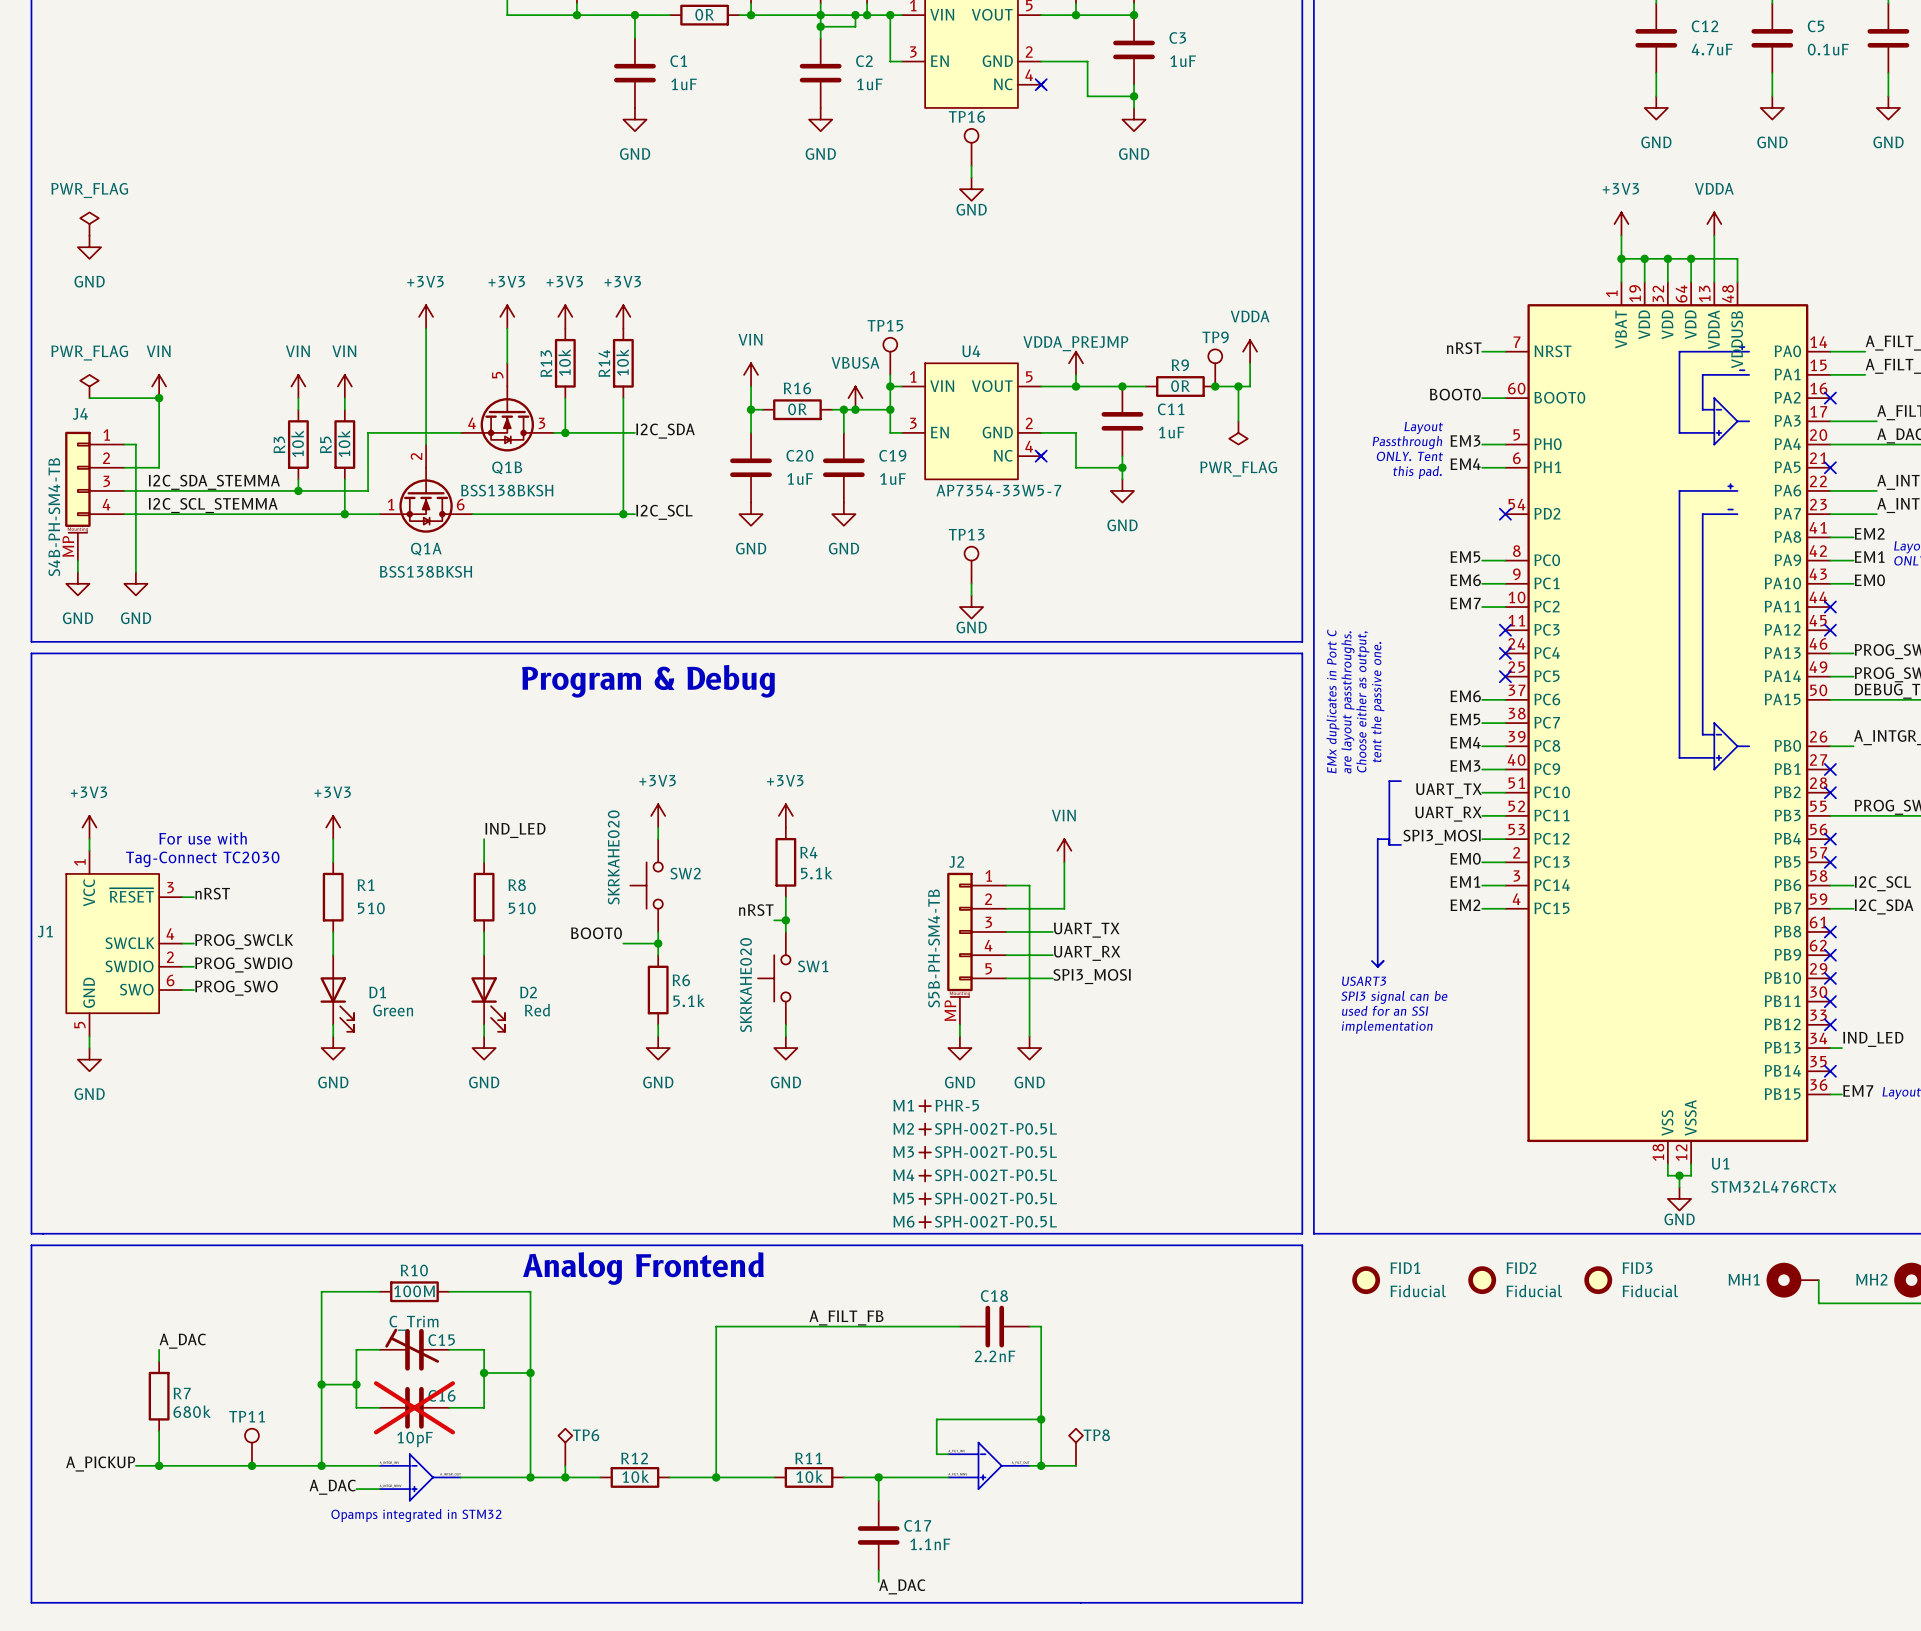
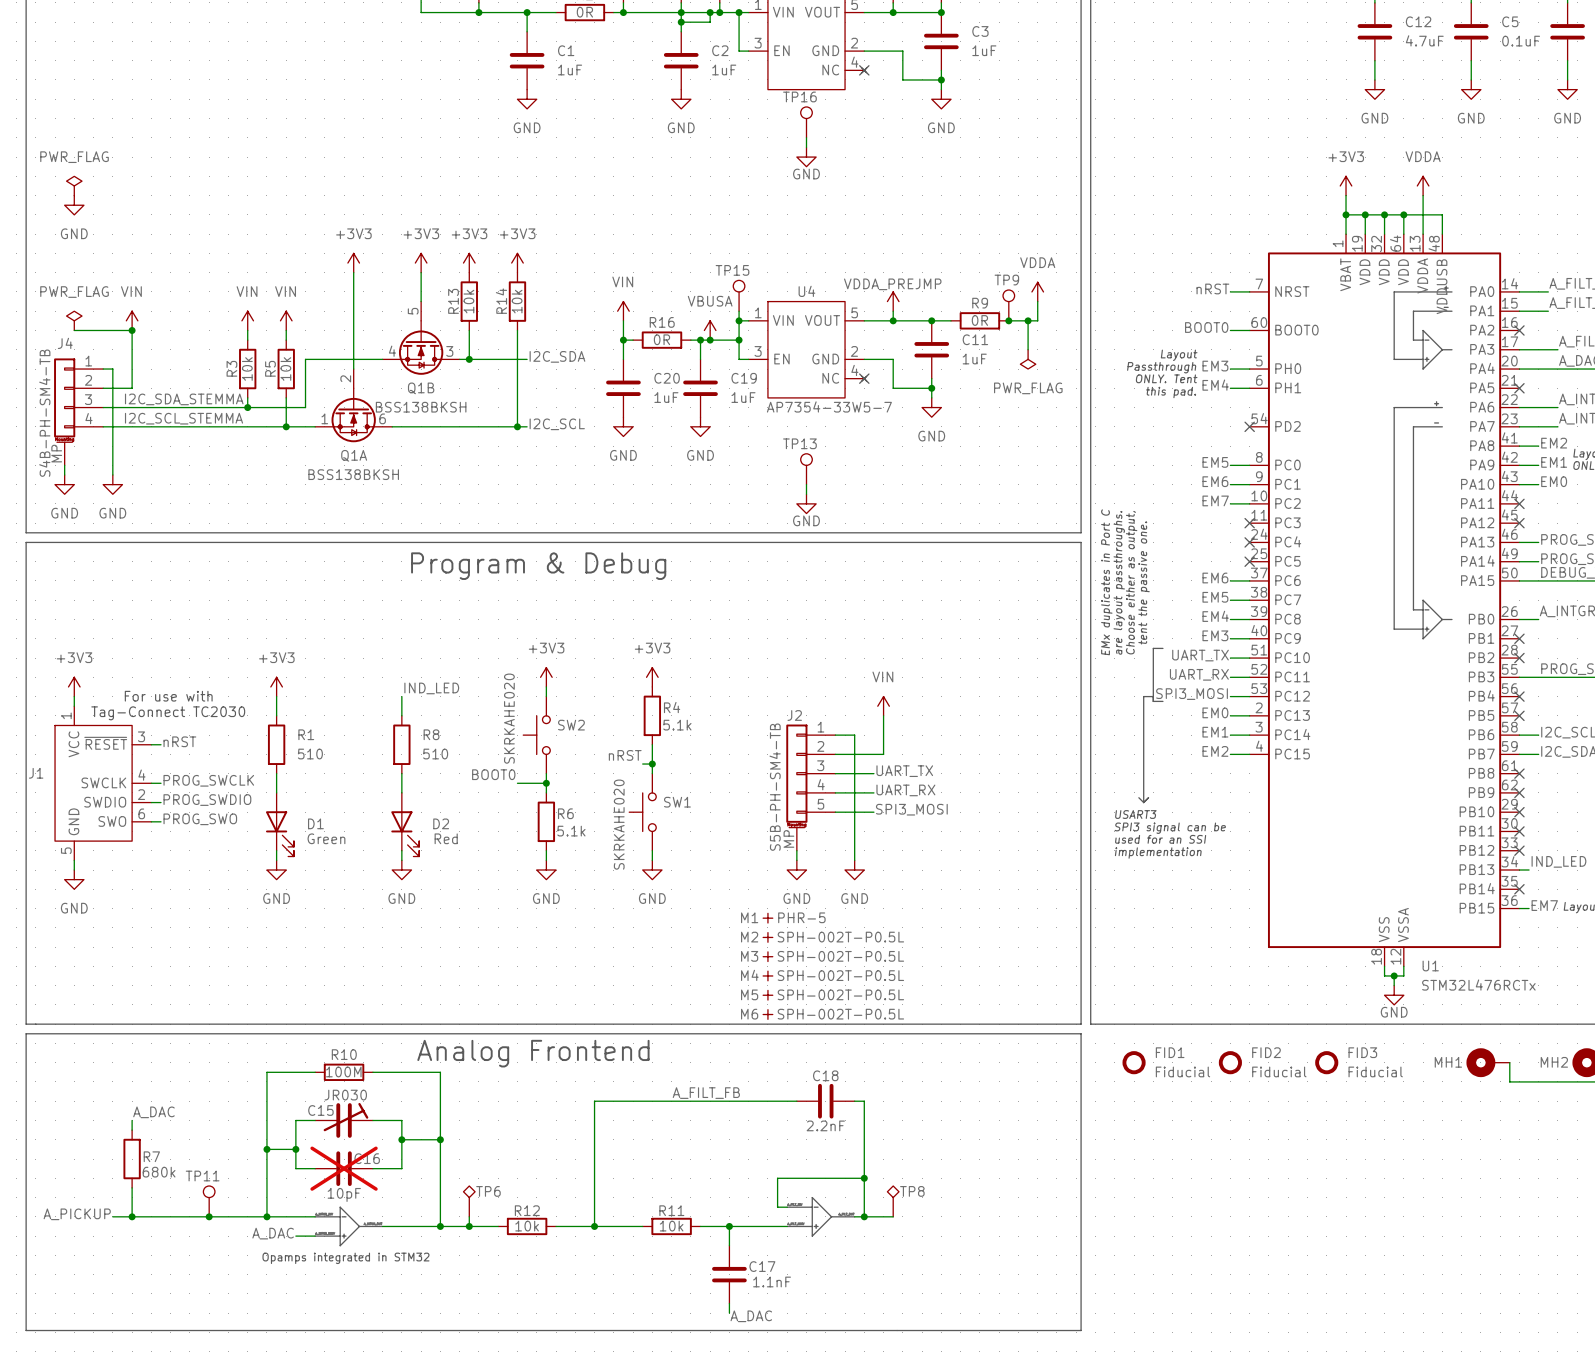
C15 value: C_Trim (414, 1323) -> JR030 (345, 1095)
C15 flip: as is (412, 1349) -> left-right (345, 1120)

